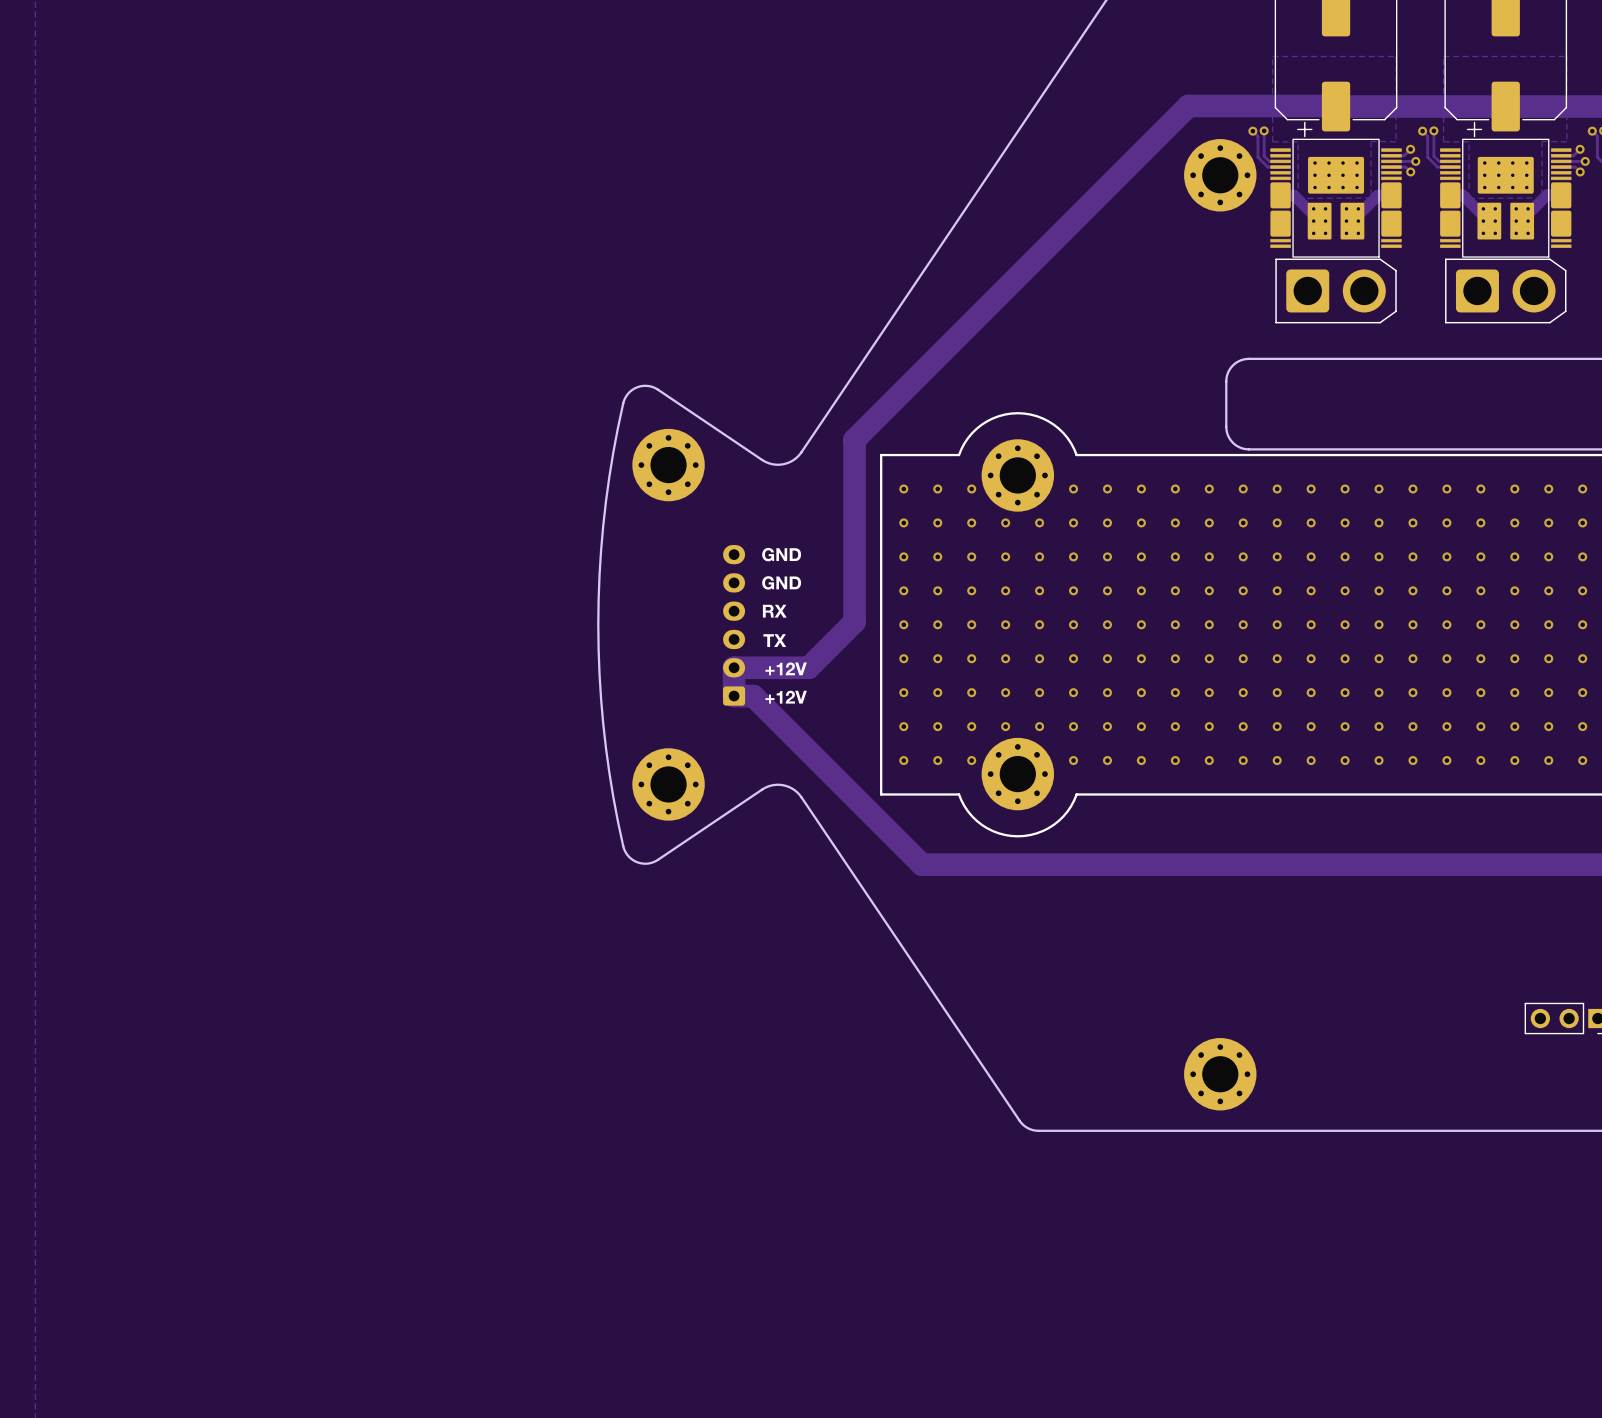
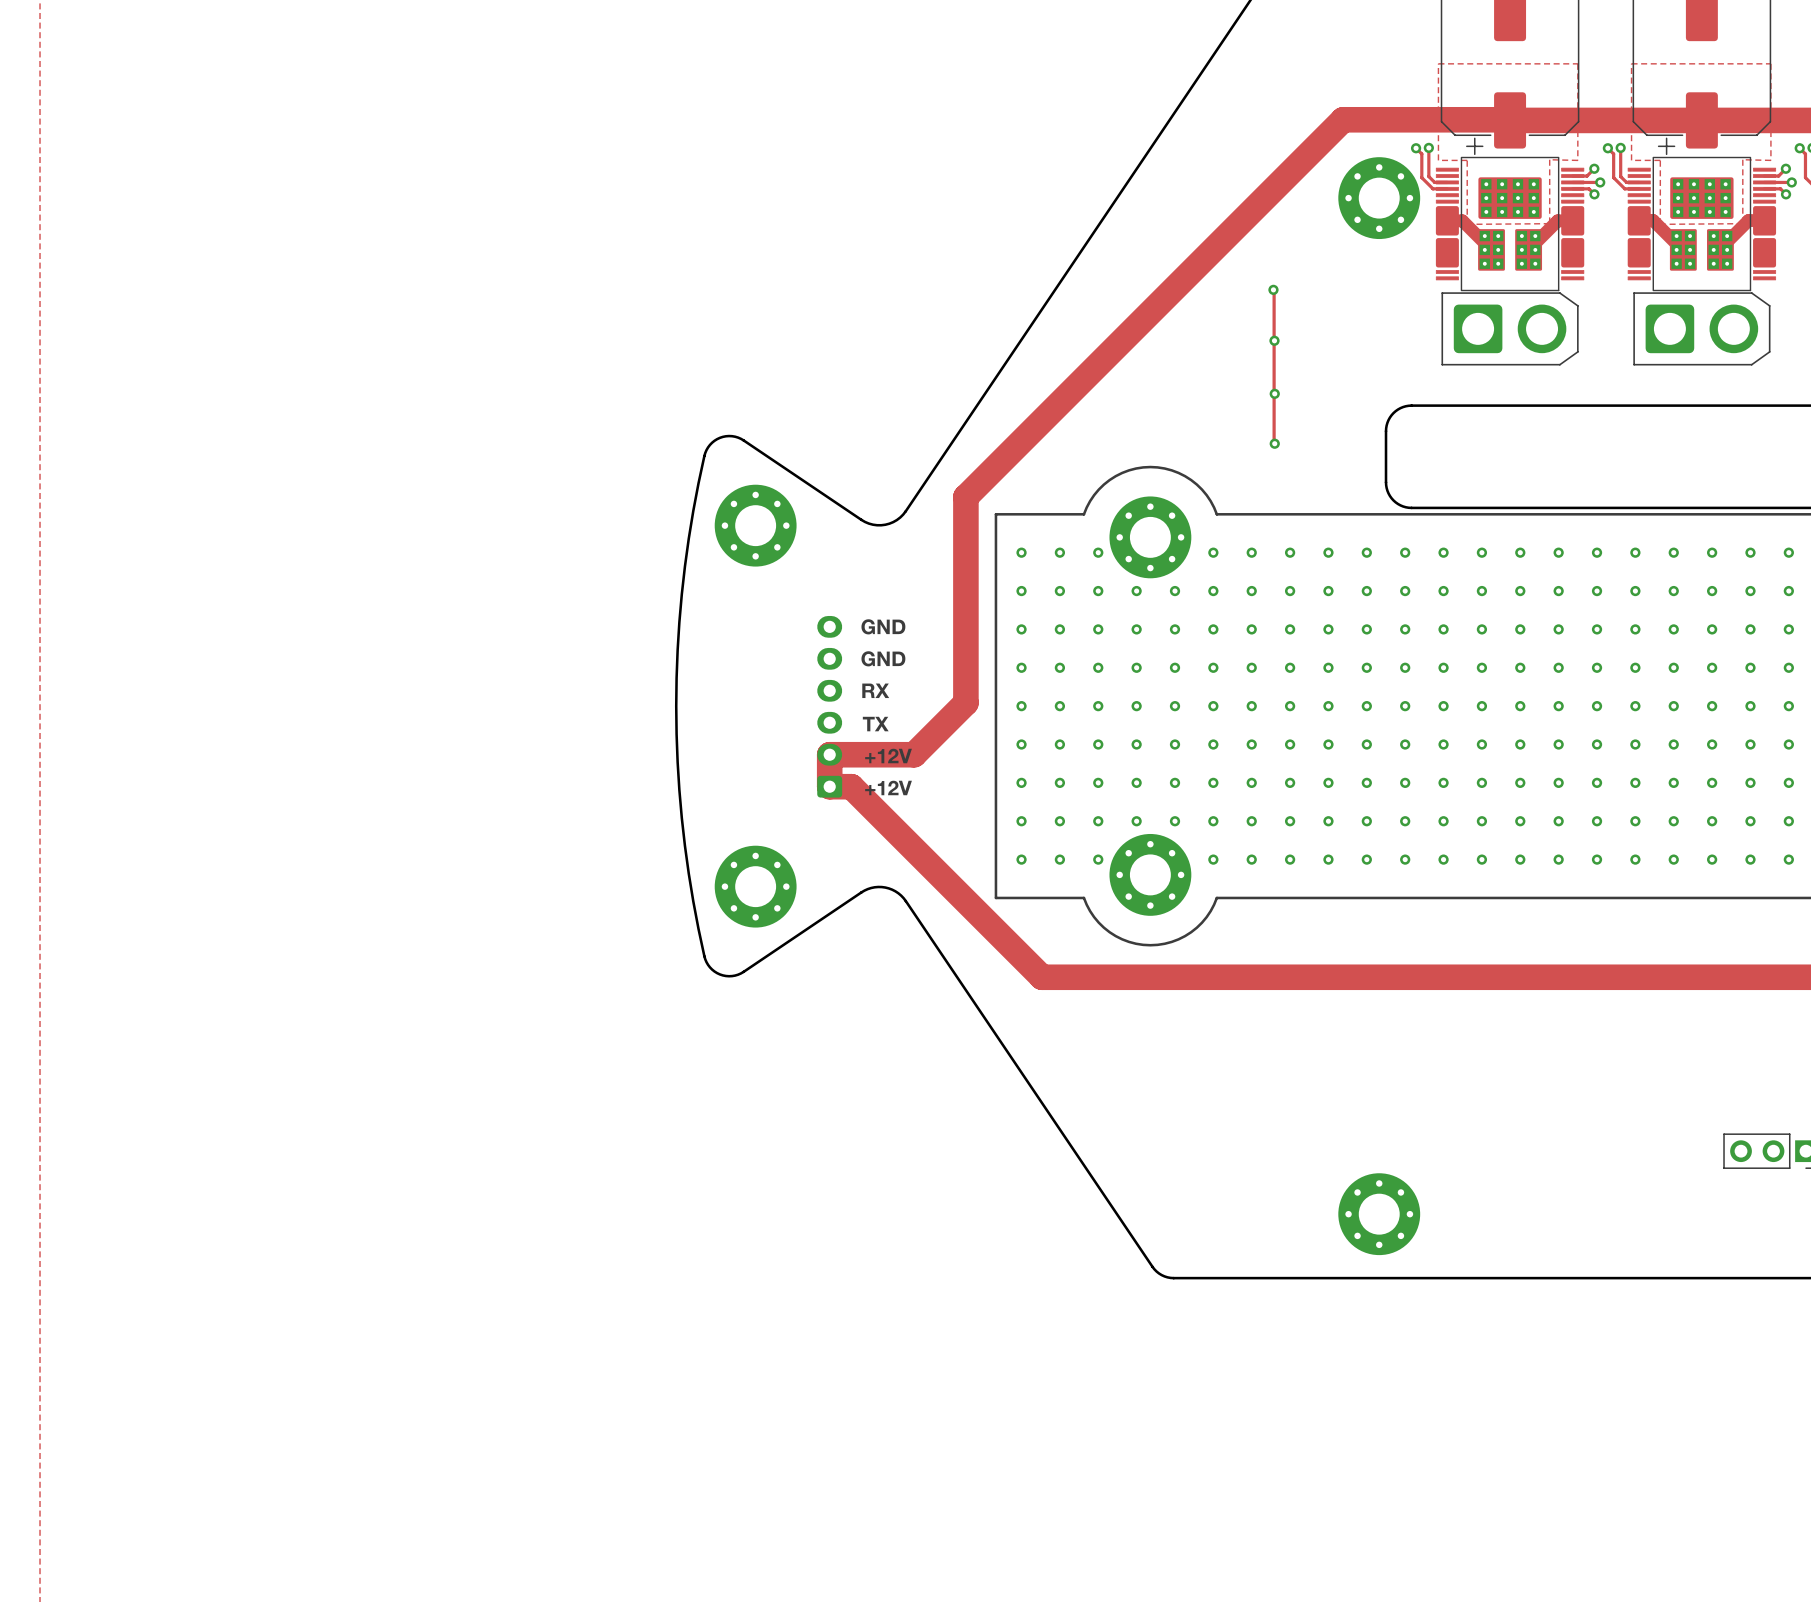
via: none -> (1273, 289)
track: none -> (1274, 290) (1274, 445)
via: none -> (1274, 340)
via: none -> (1274, 393)
via: none -> (1274, 443)

